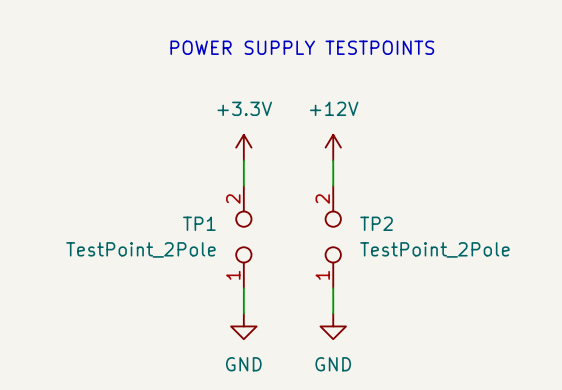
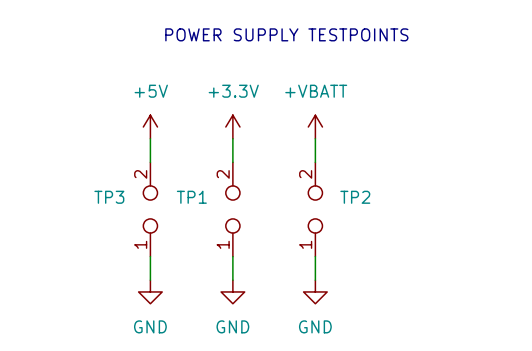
power symbol: none -> +5V (150, 127)
power symbol: +12V (333, 147) -> +VBATT (315, 127)
wire: none -> (150, 138) (150, 162)
TP3: none -> (150, 209)
TP1 value: TestPoint_2Pole (140, 249) -> none
TP2 value: TestPoint_2Pole (434, 249) -> none
wire: none -> (150, 256) (150, 280)
power symbol: none -> GND (150, 291)

